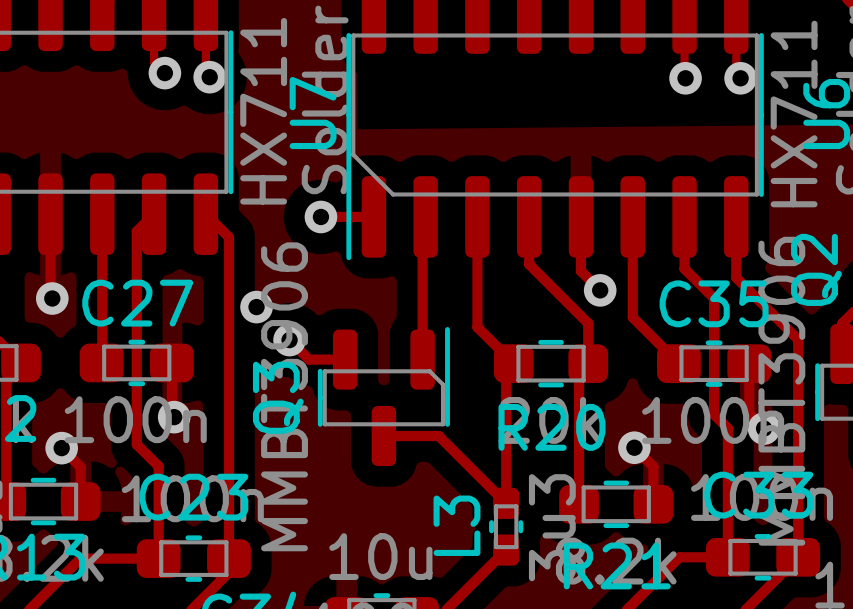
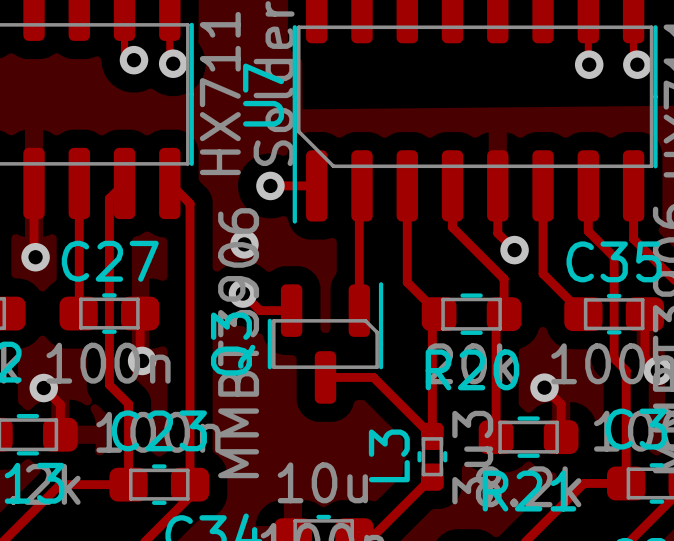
via position: (256, 307) -> (244, 244)

